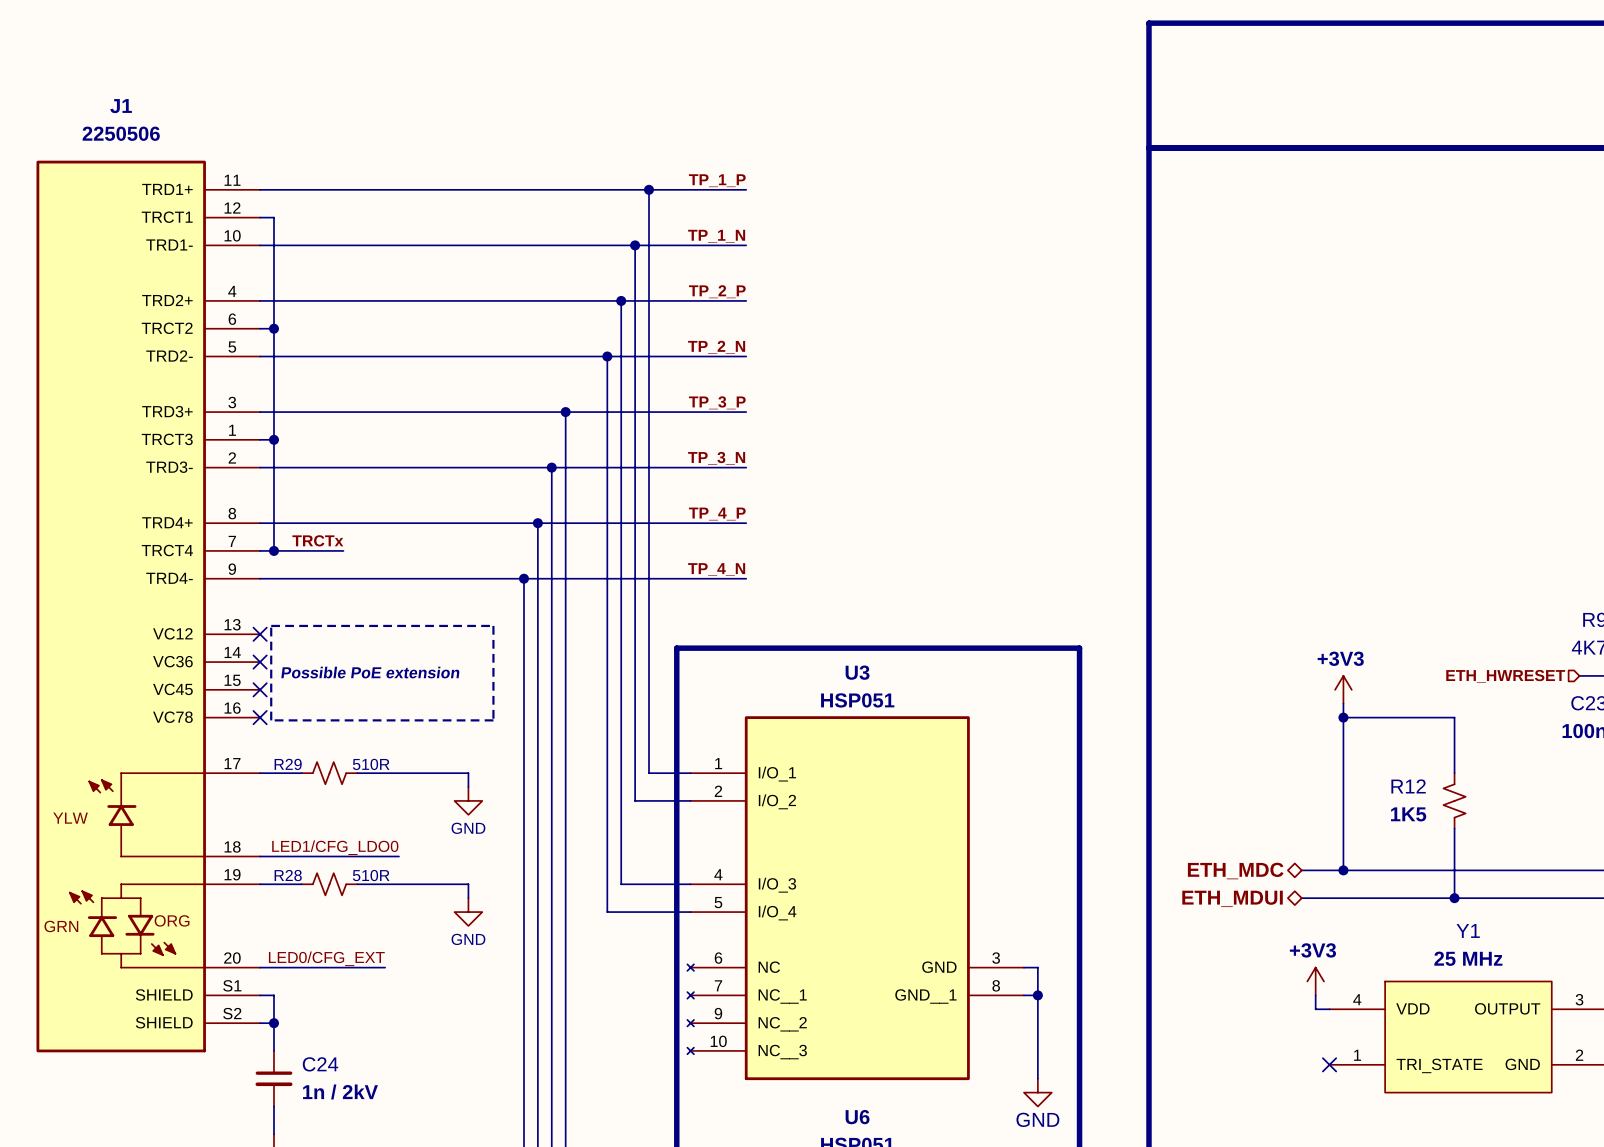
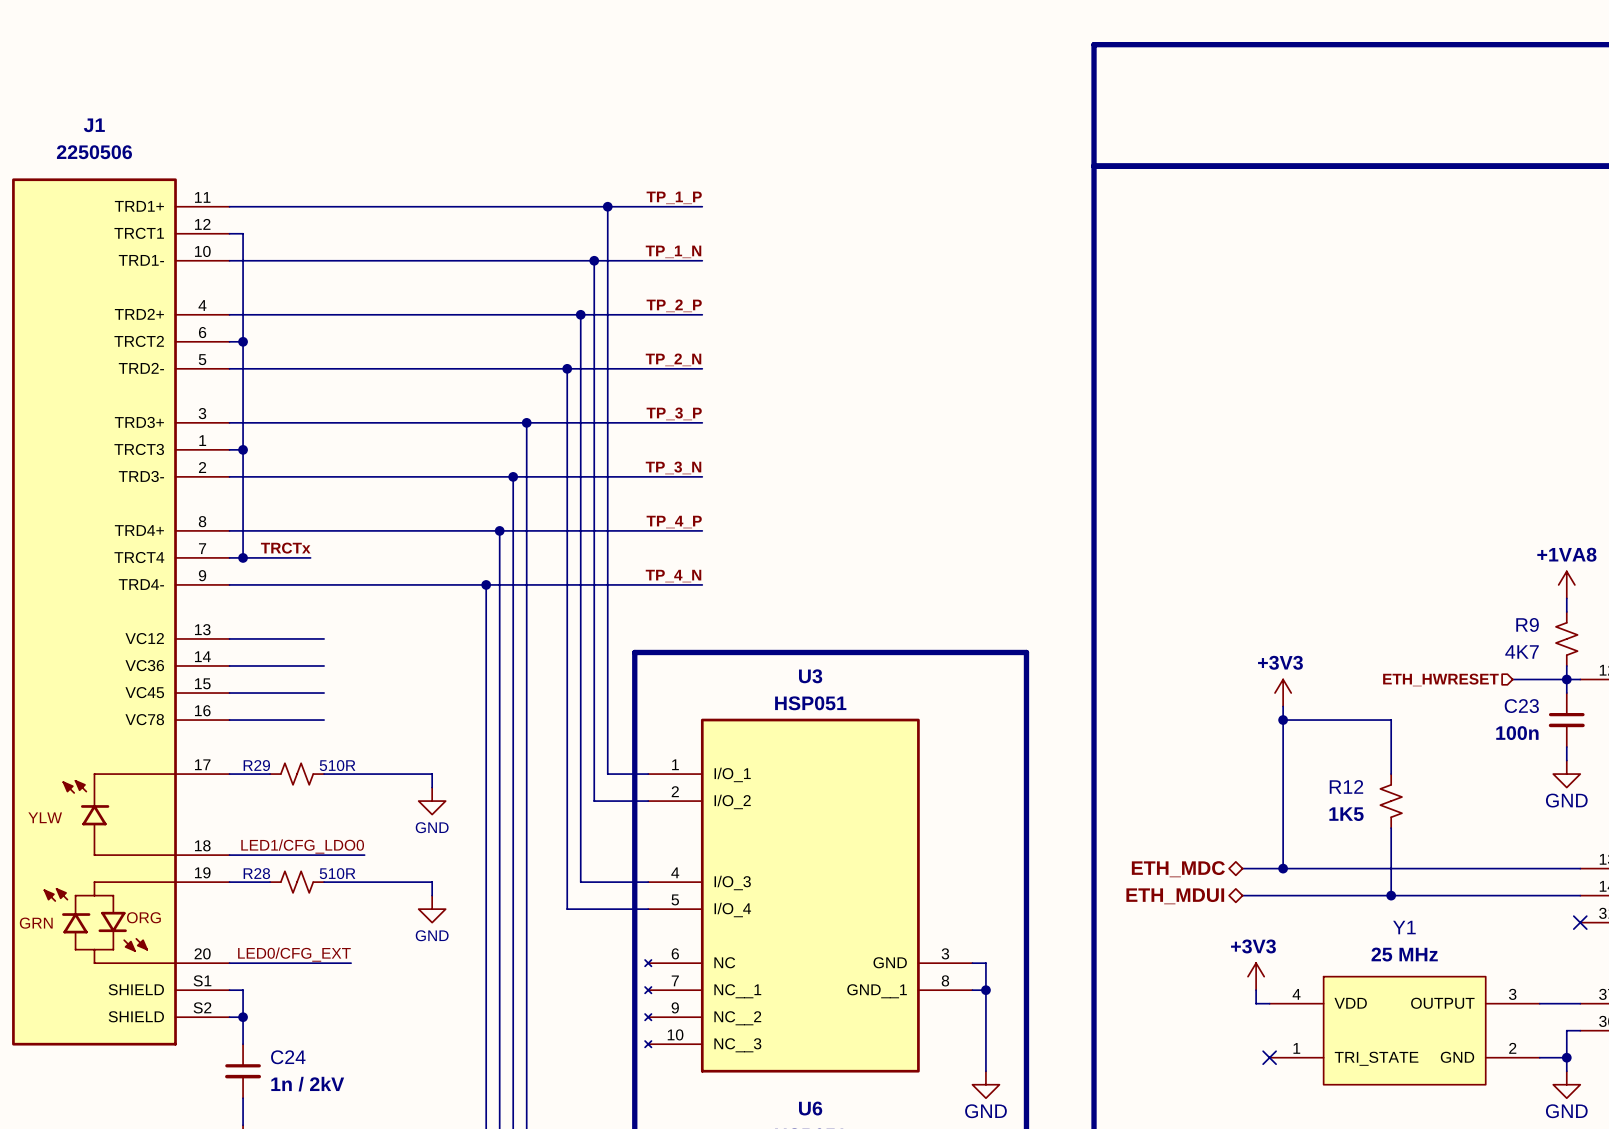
line: (271, 625) (493, 625) (493, 720) (271, 720) (271, 625) -> none
wire: none -> (229, 638) (324, 638)
no-connect mark: (260, 634) -> none
wire: none -> (229, 665) (324, 665)
no-connect mark: (260, 662) -> none
text: Possible PoE extension (370, 672) -> none
wire: none -> (229, 693) (324, 693)
no-connect mark: (260, 689) -> none
wire: none -> (229, 720) (324, 720)
no-connect mark: (260, 717) -> none

